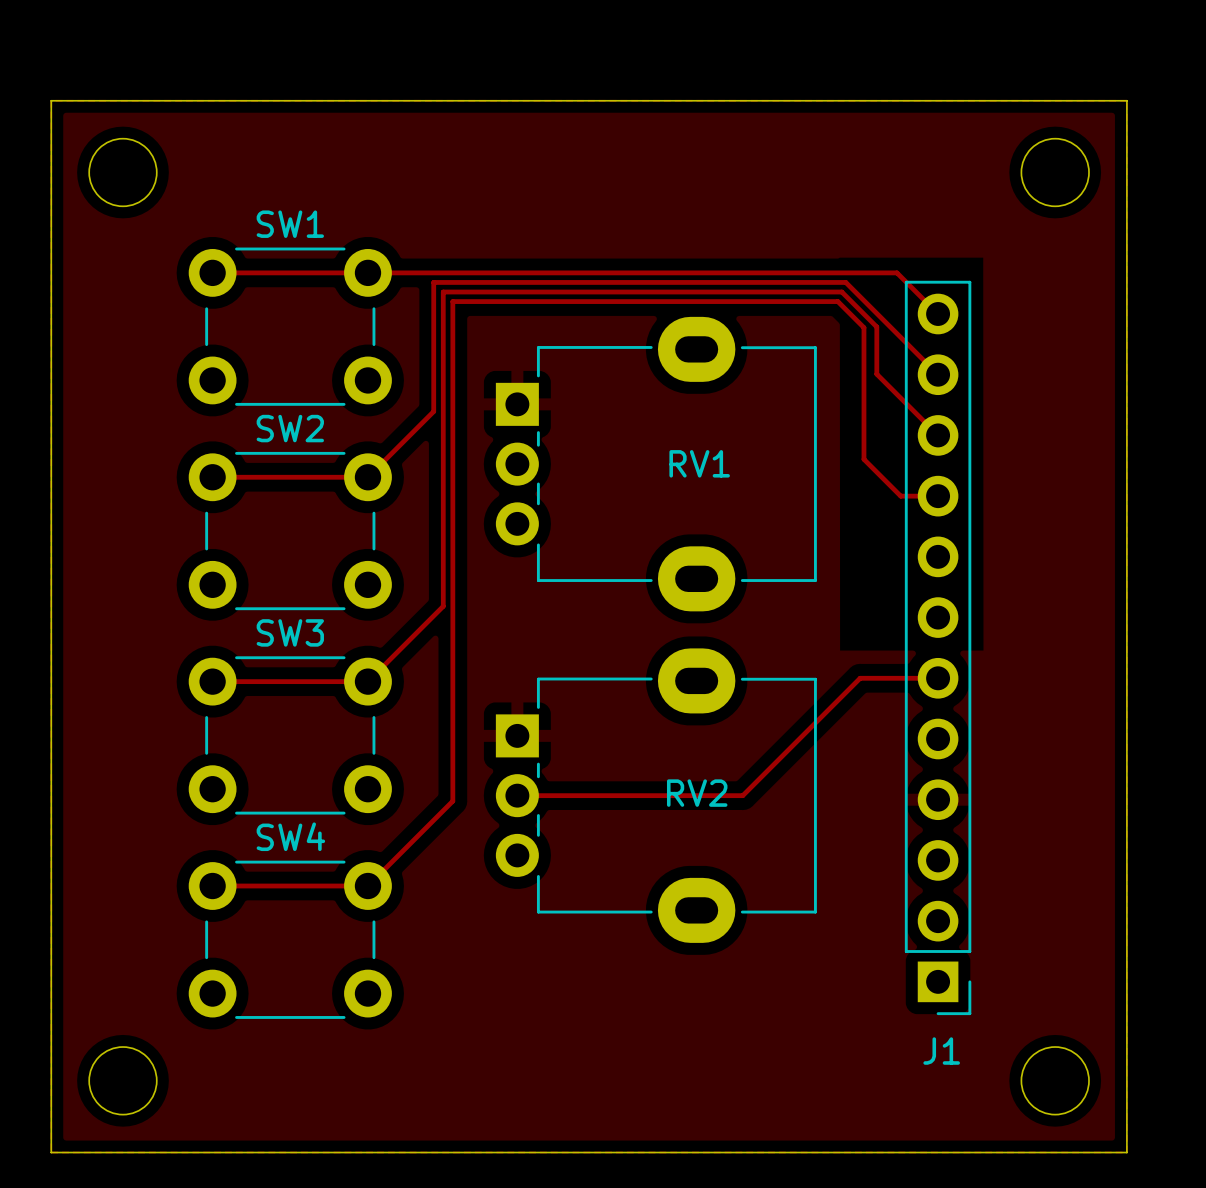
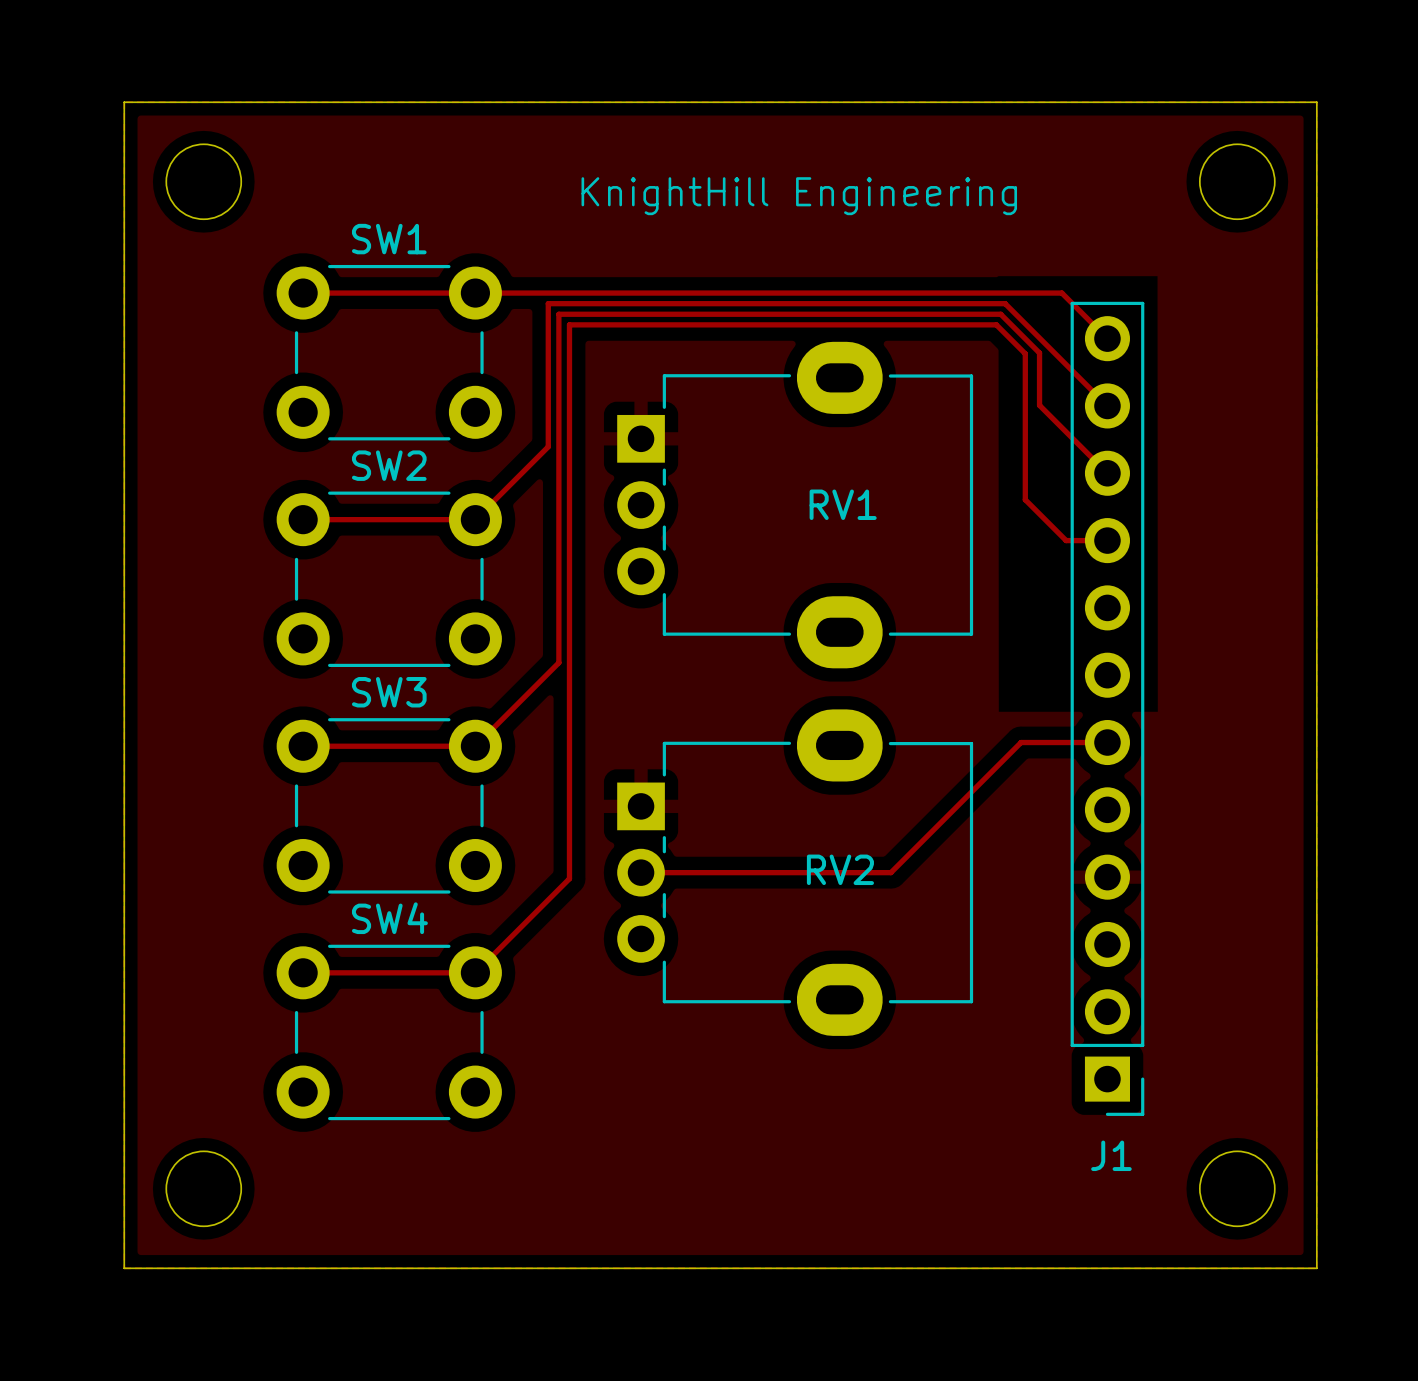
text: none -> KnightHill Engineering (799, 196)

